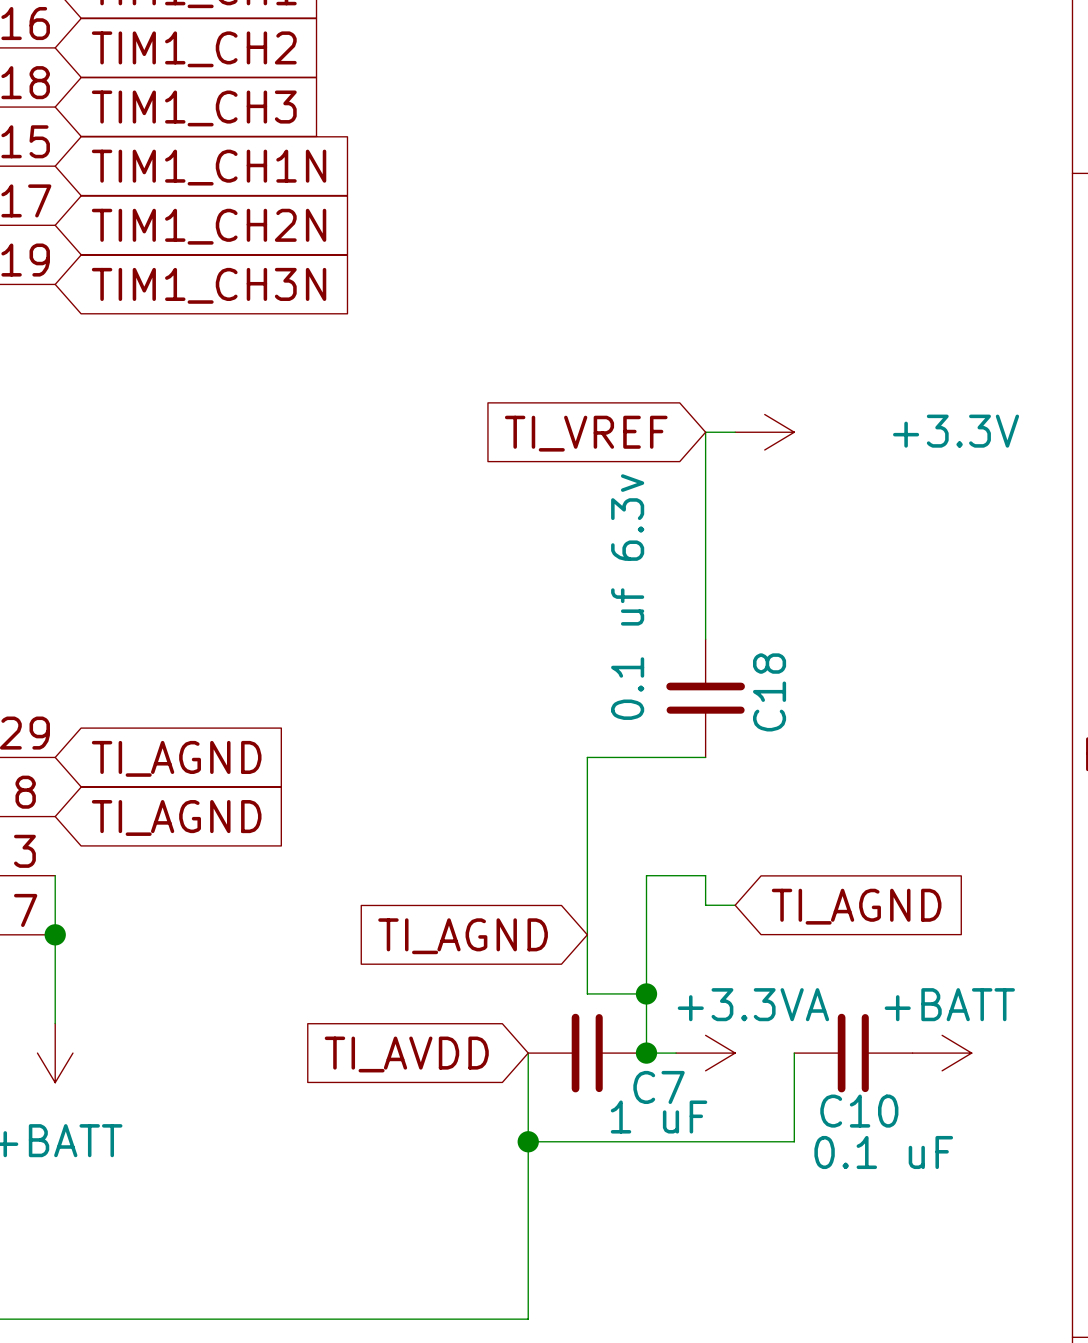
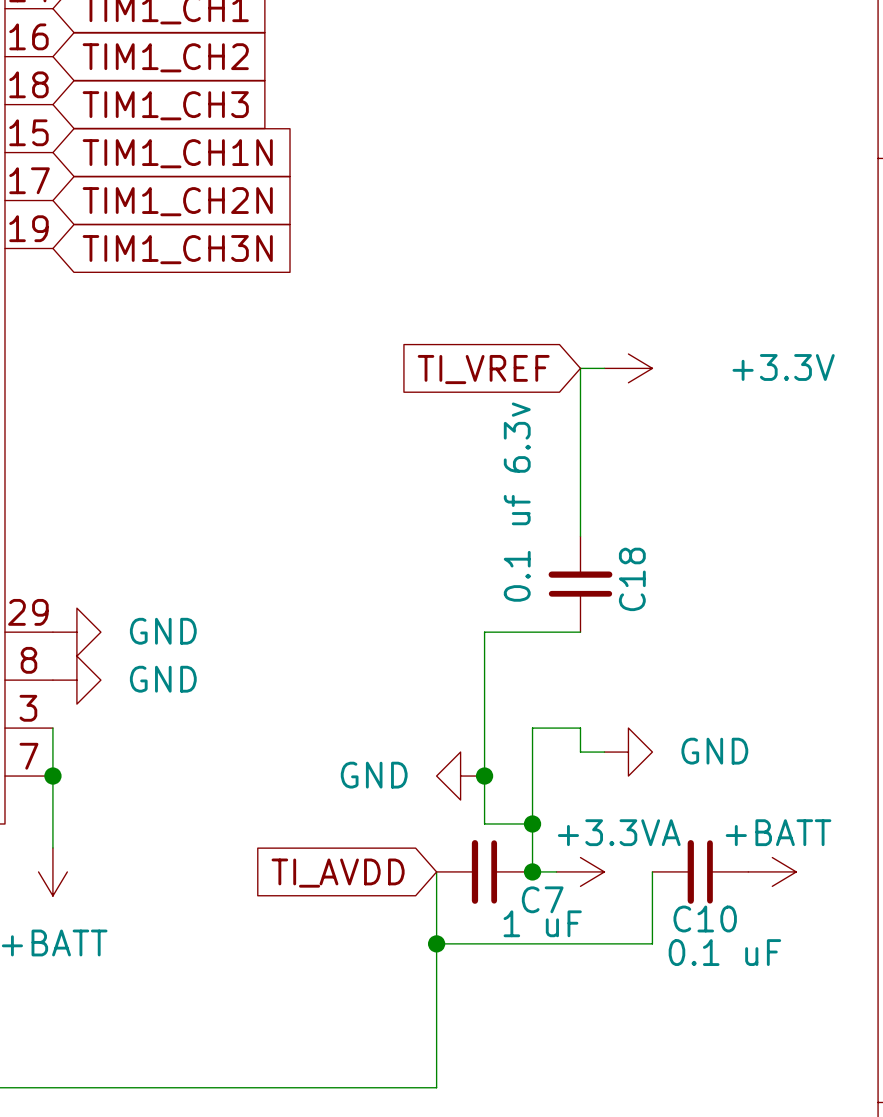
power symbol: none -> GND (76, 632)
global label: TI_AGND (176, 758) -> none
power symbol: none -> GND (76, 680)
global label: TI_AGND (176, 817) -> none
power symbol: none -> GND (628, 752)
global label: TI_AGND (856, 906) -> none
power symbol: none -> GND (460, 776)
junction: none -> (484, 776)
global label: TI_AGND (463, 936) -> none

